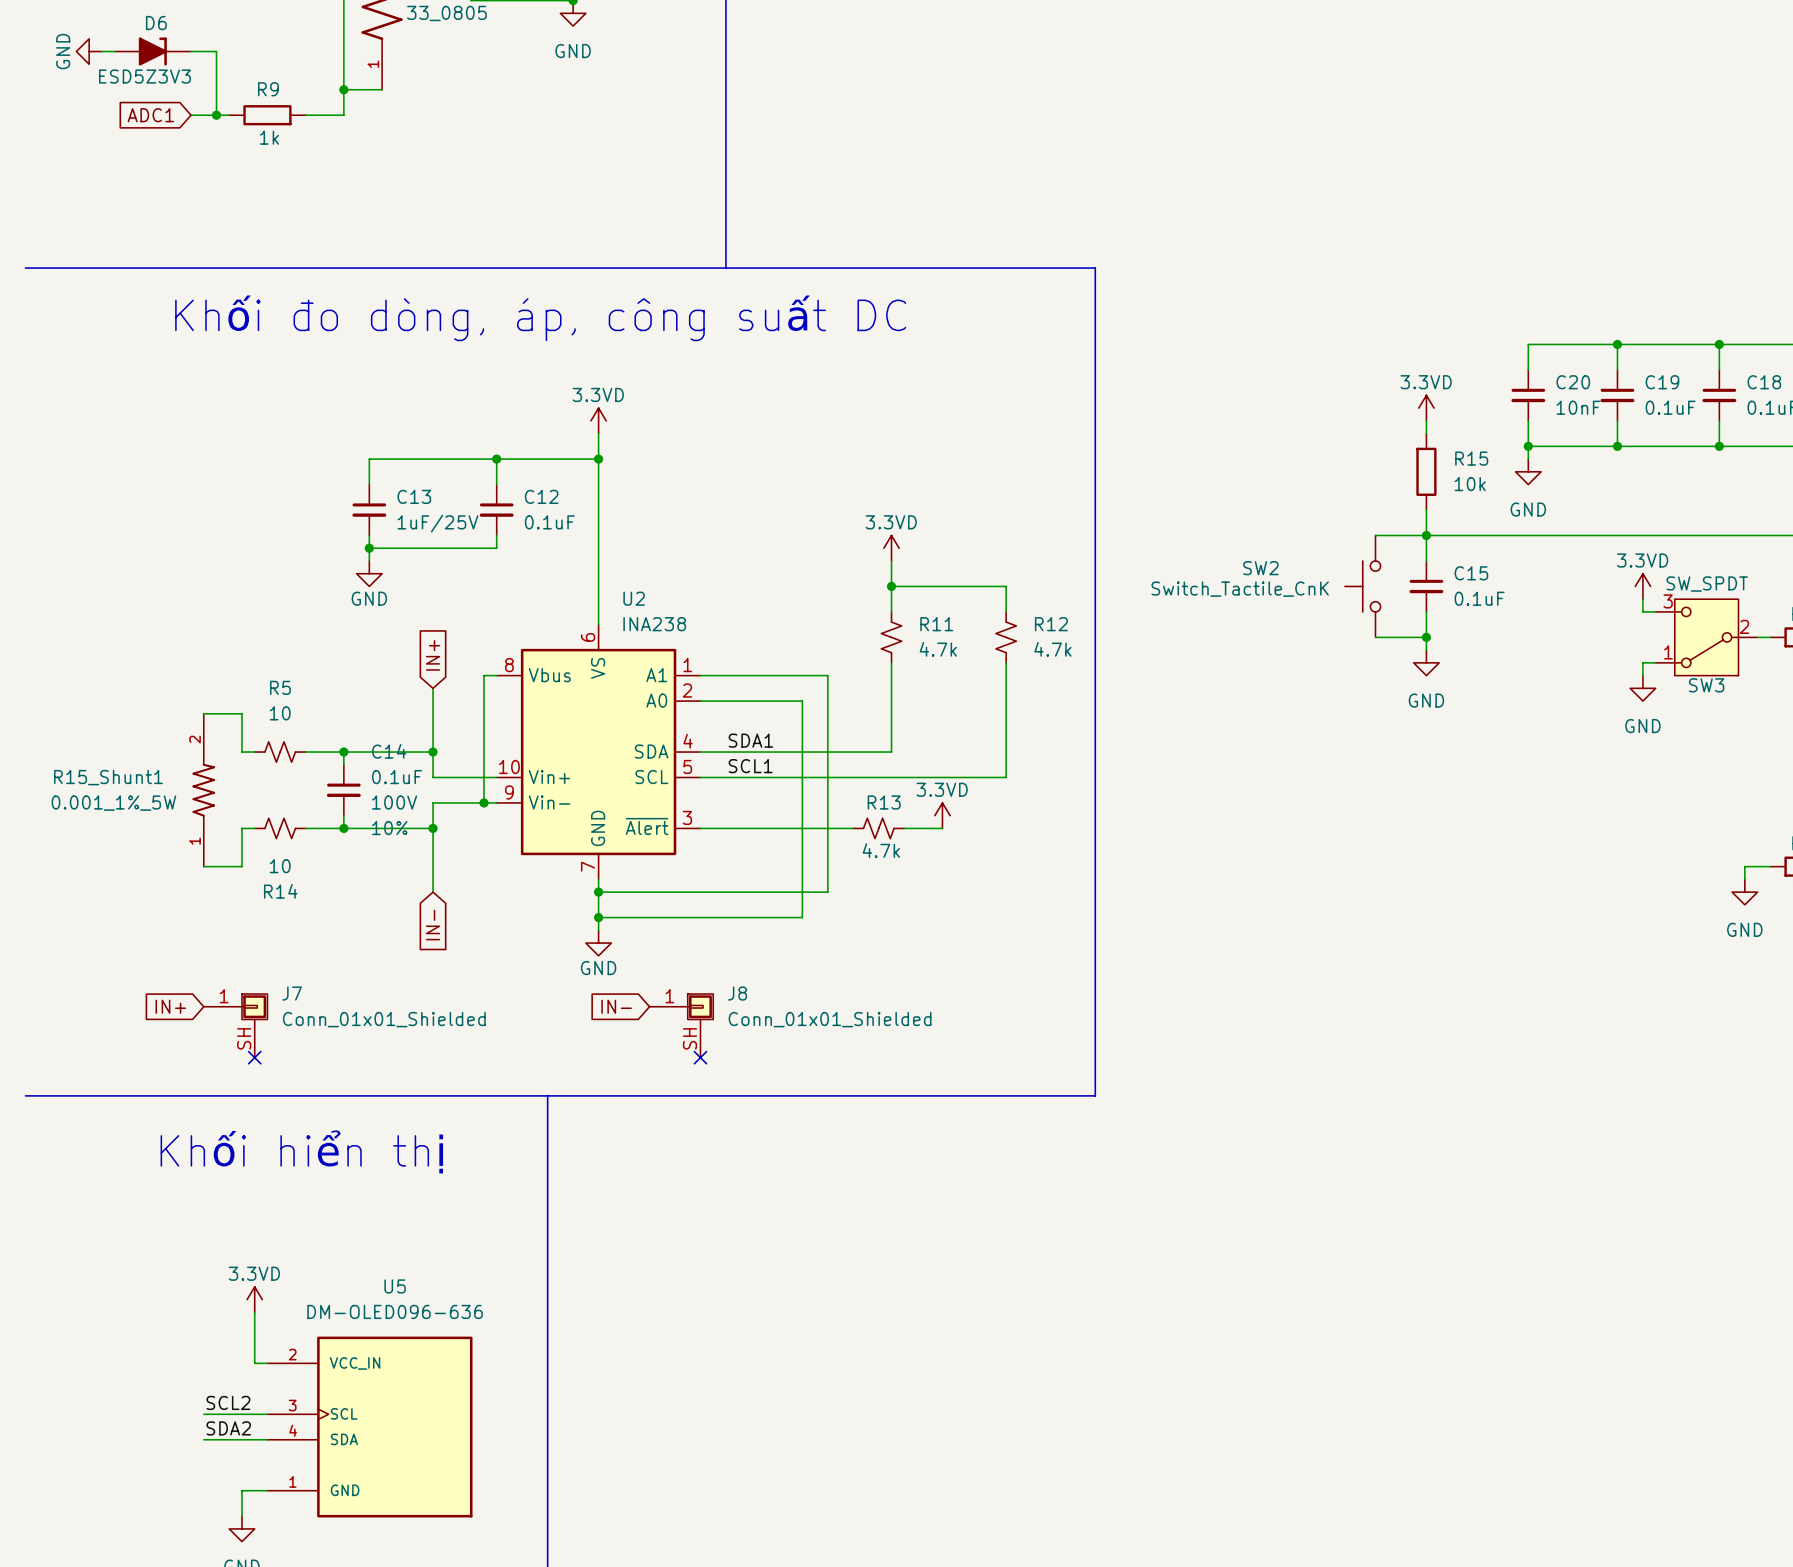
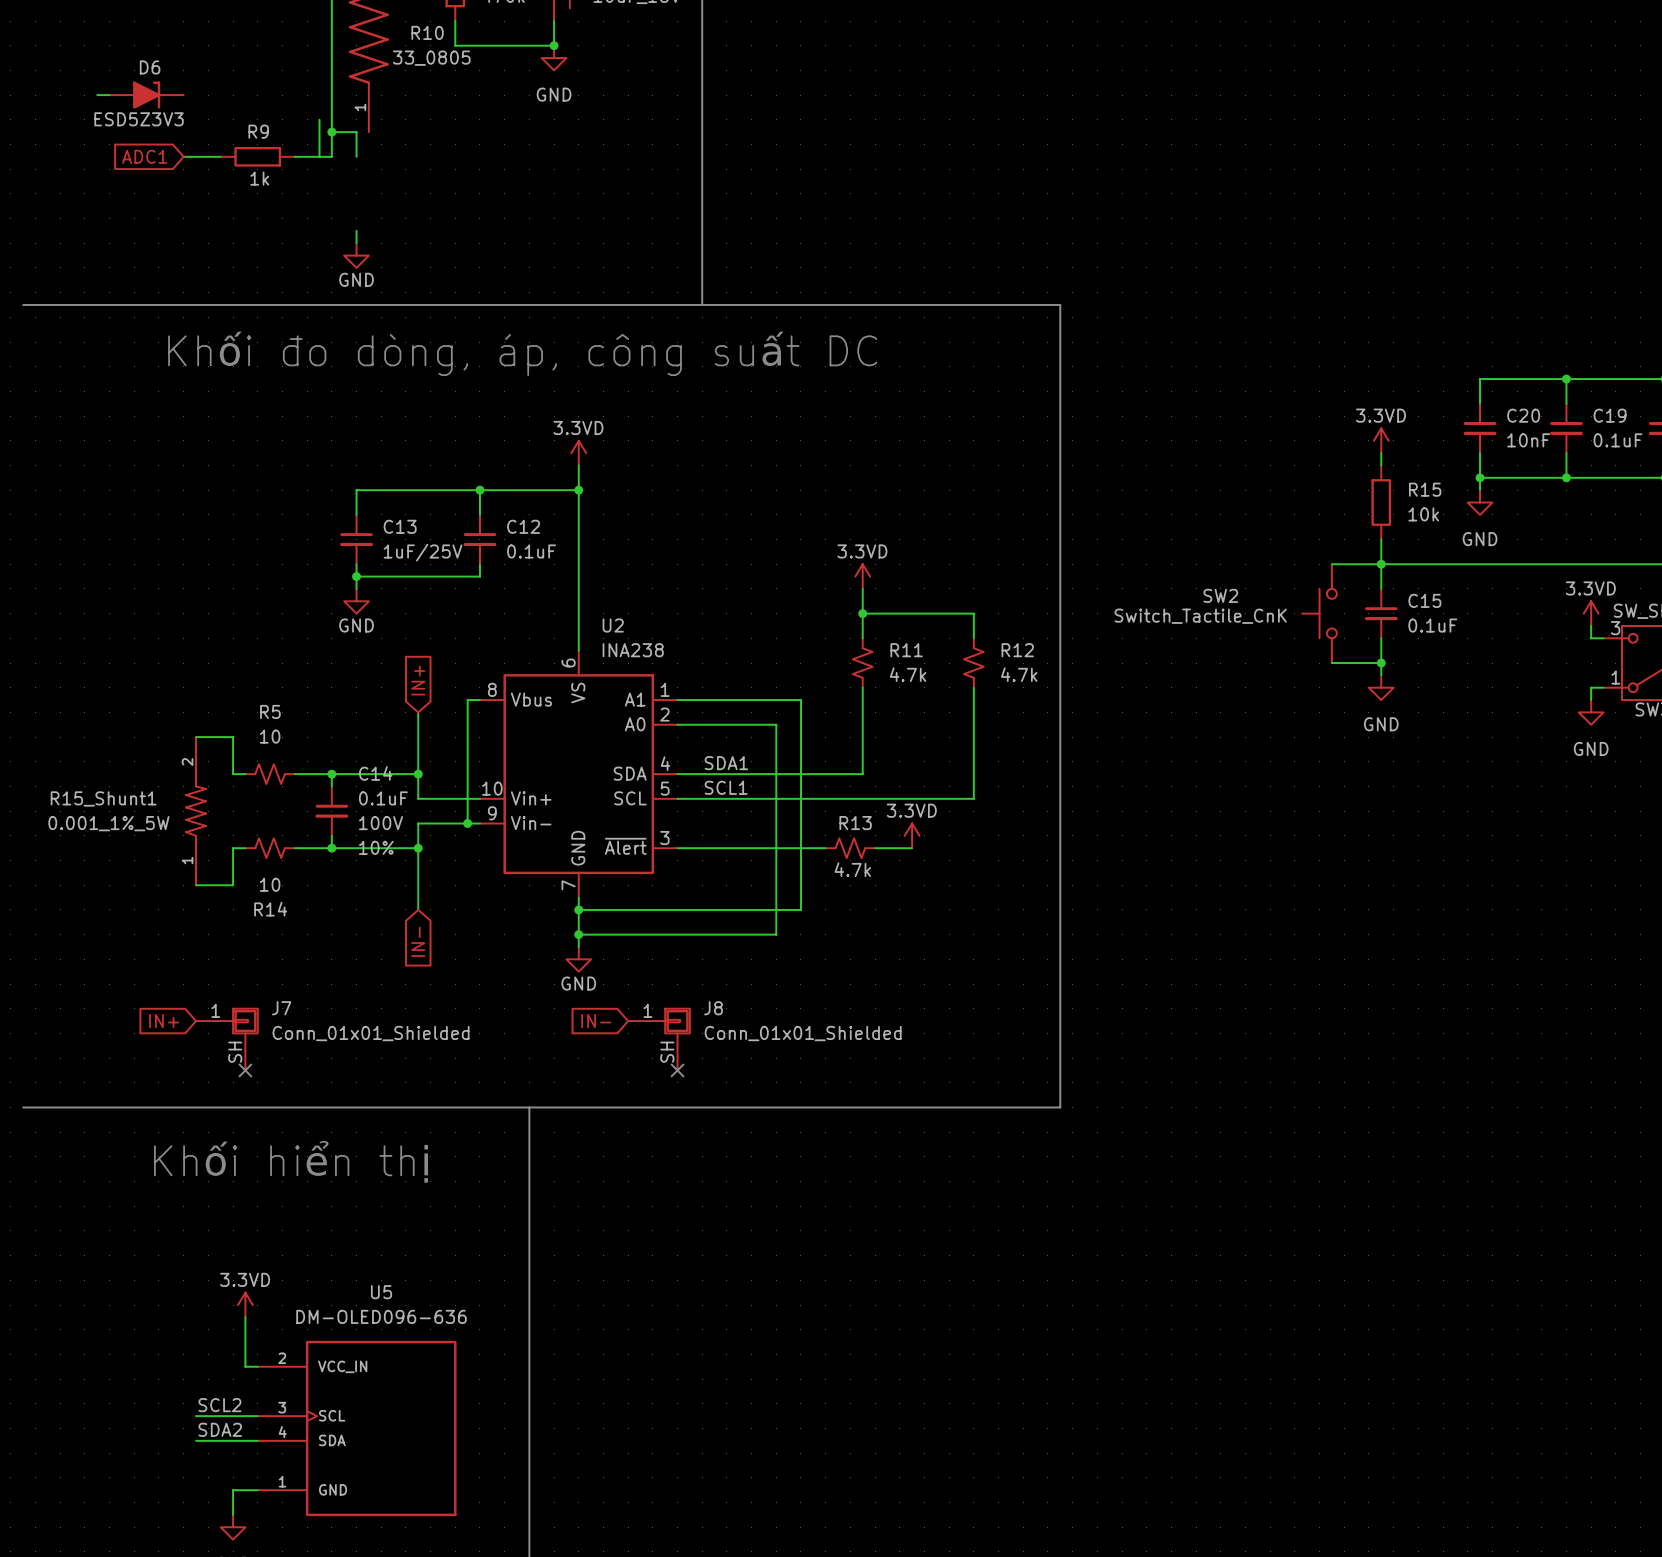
power symbol: GND (89, 51) -> none
wire: (191, 51) (216, 51) (216, 115) -> none
wire: none -> (319, 119) (319, 156)
wire: (369, 89) (382, 89) -> (356, 132) (356, 156)
junction: (216, 115) -> none
wire: none -> (356, 230) (356, 243)
power symbol: none -> GND (356, 255)

